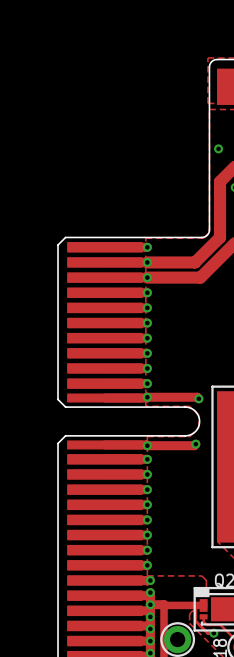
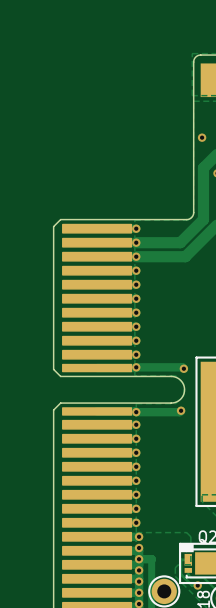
track: (164, 605) (203, 605) -> none

